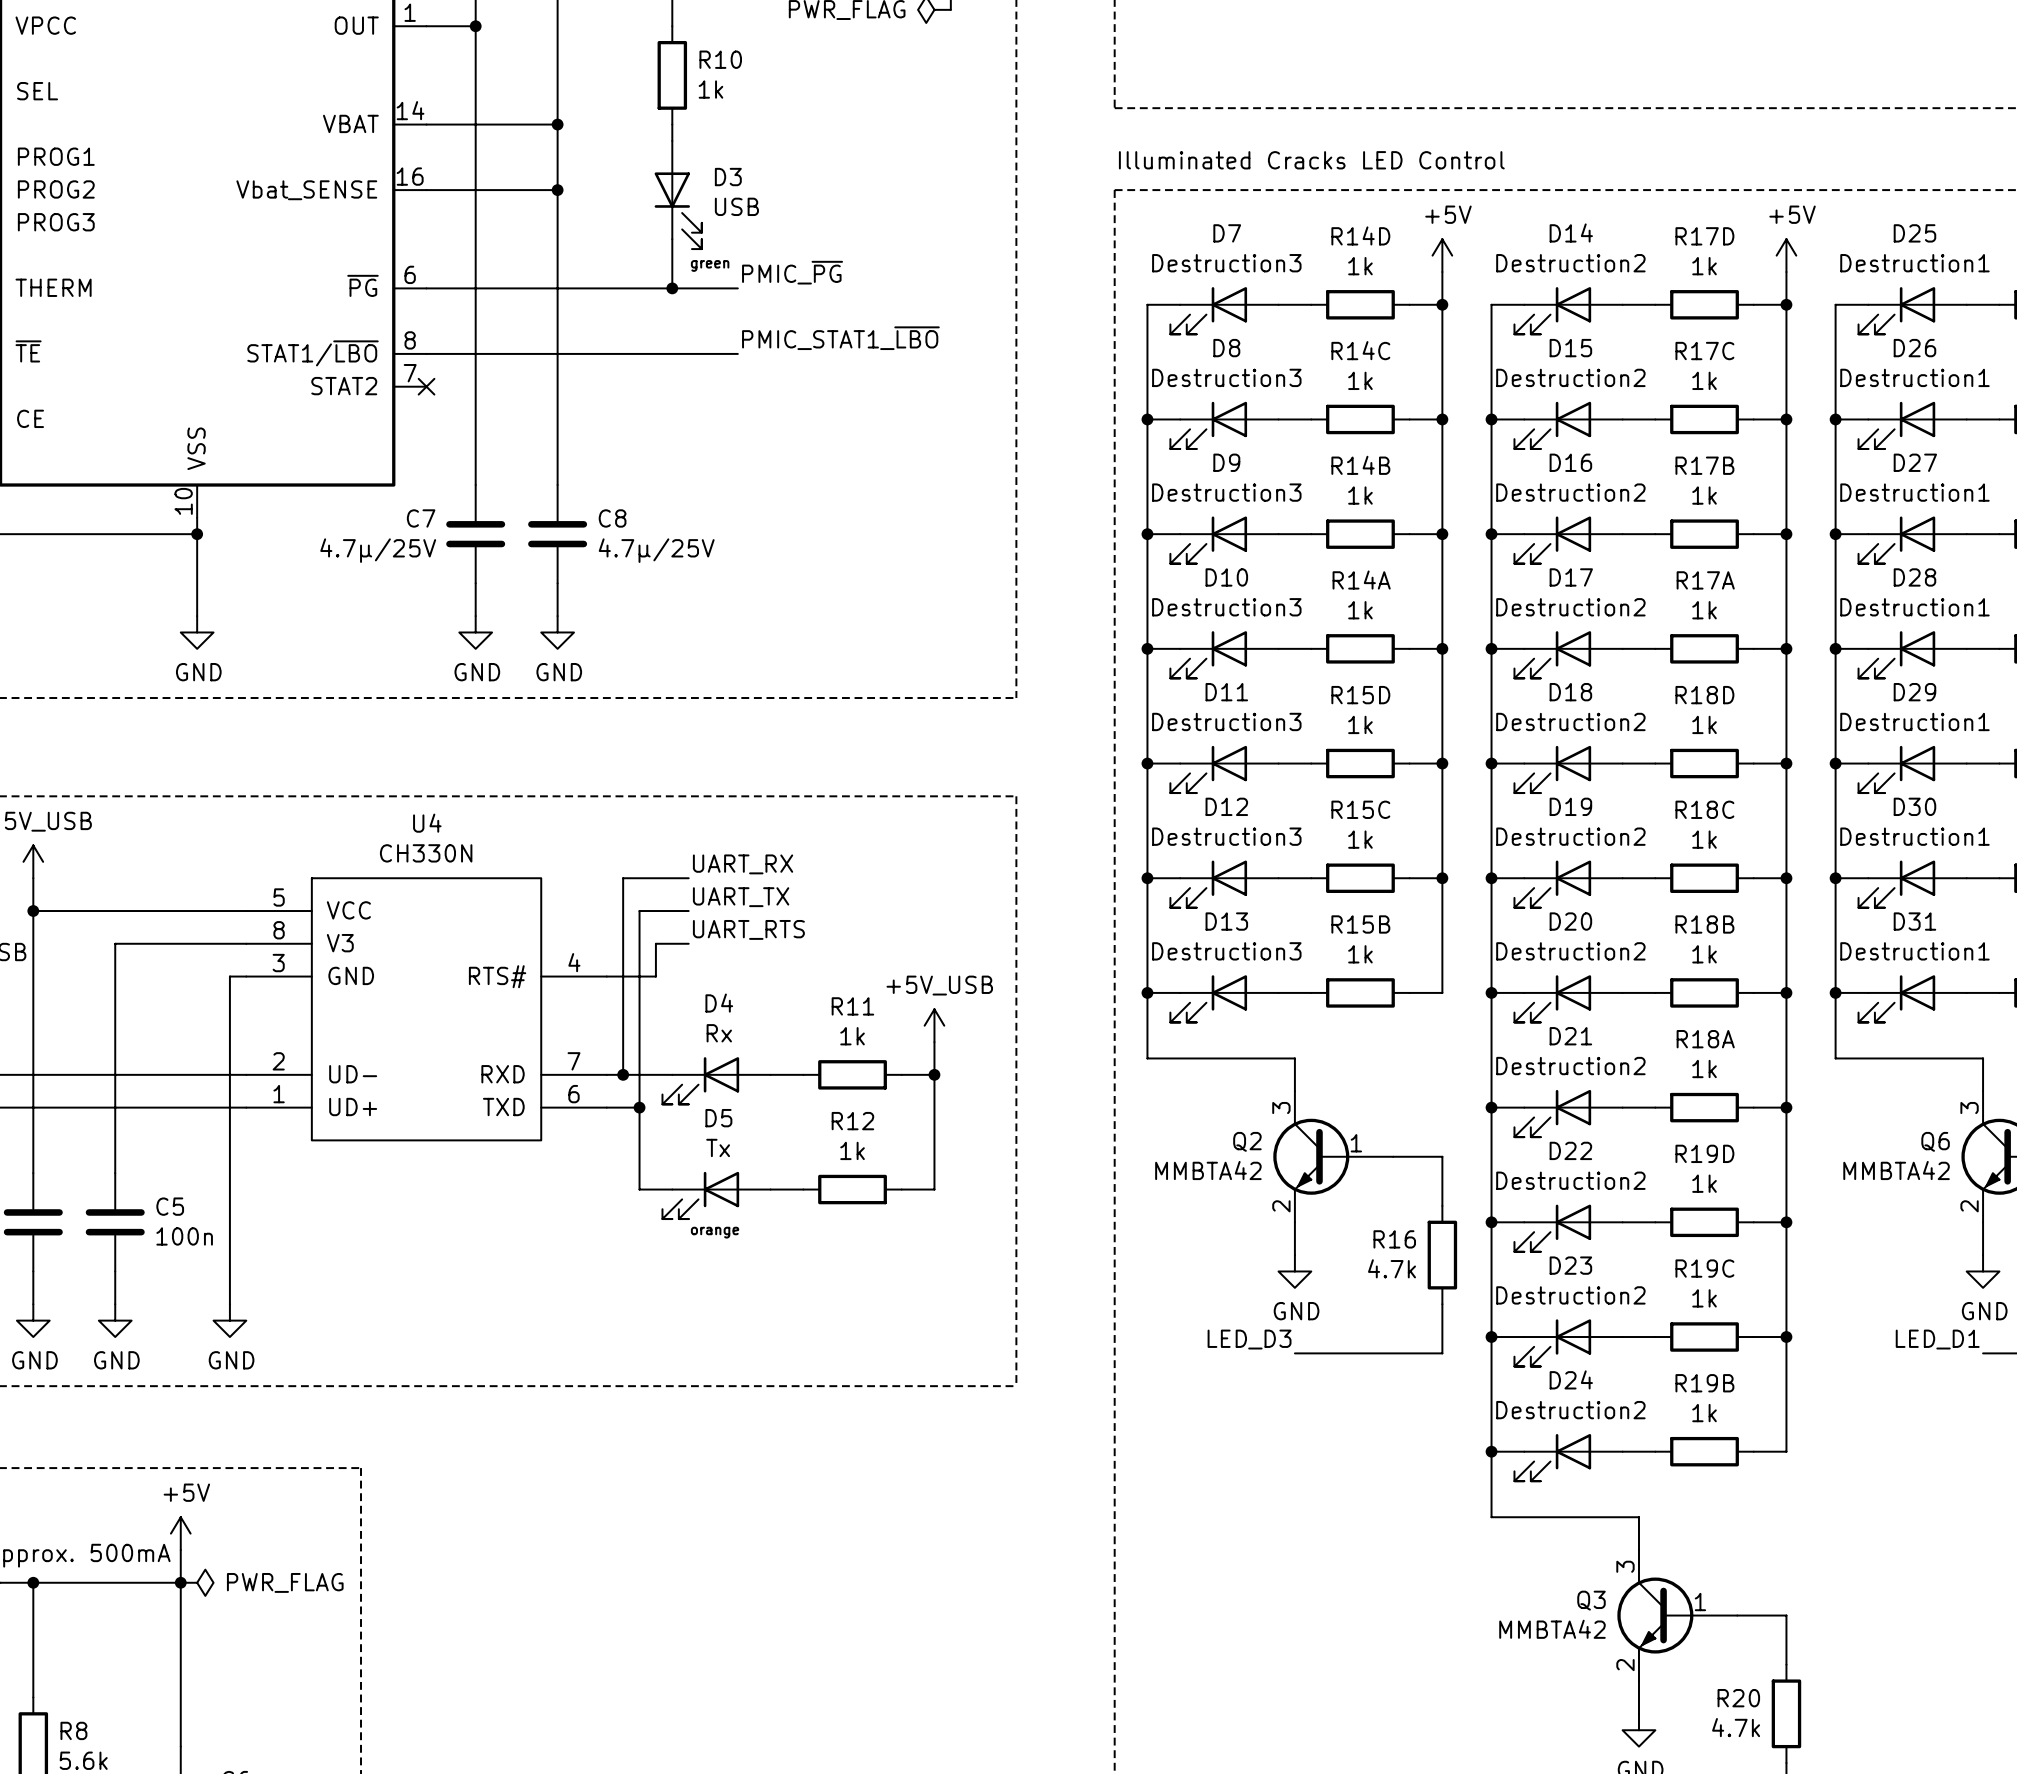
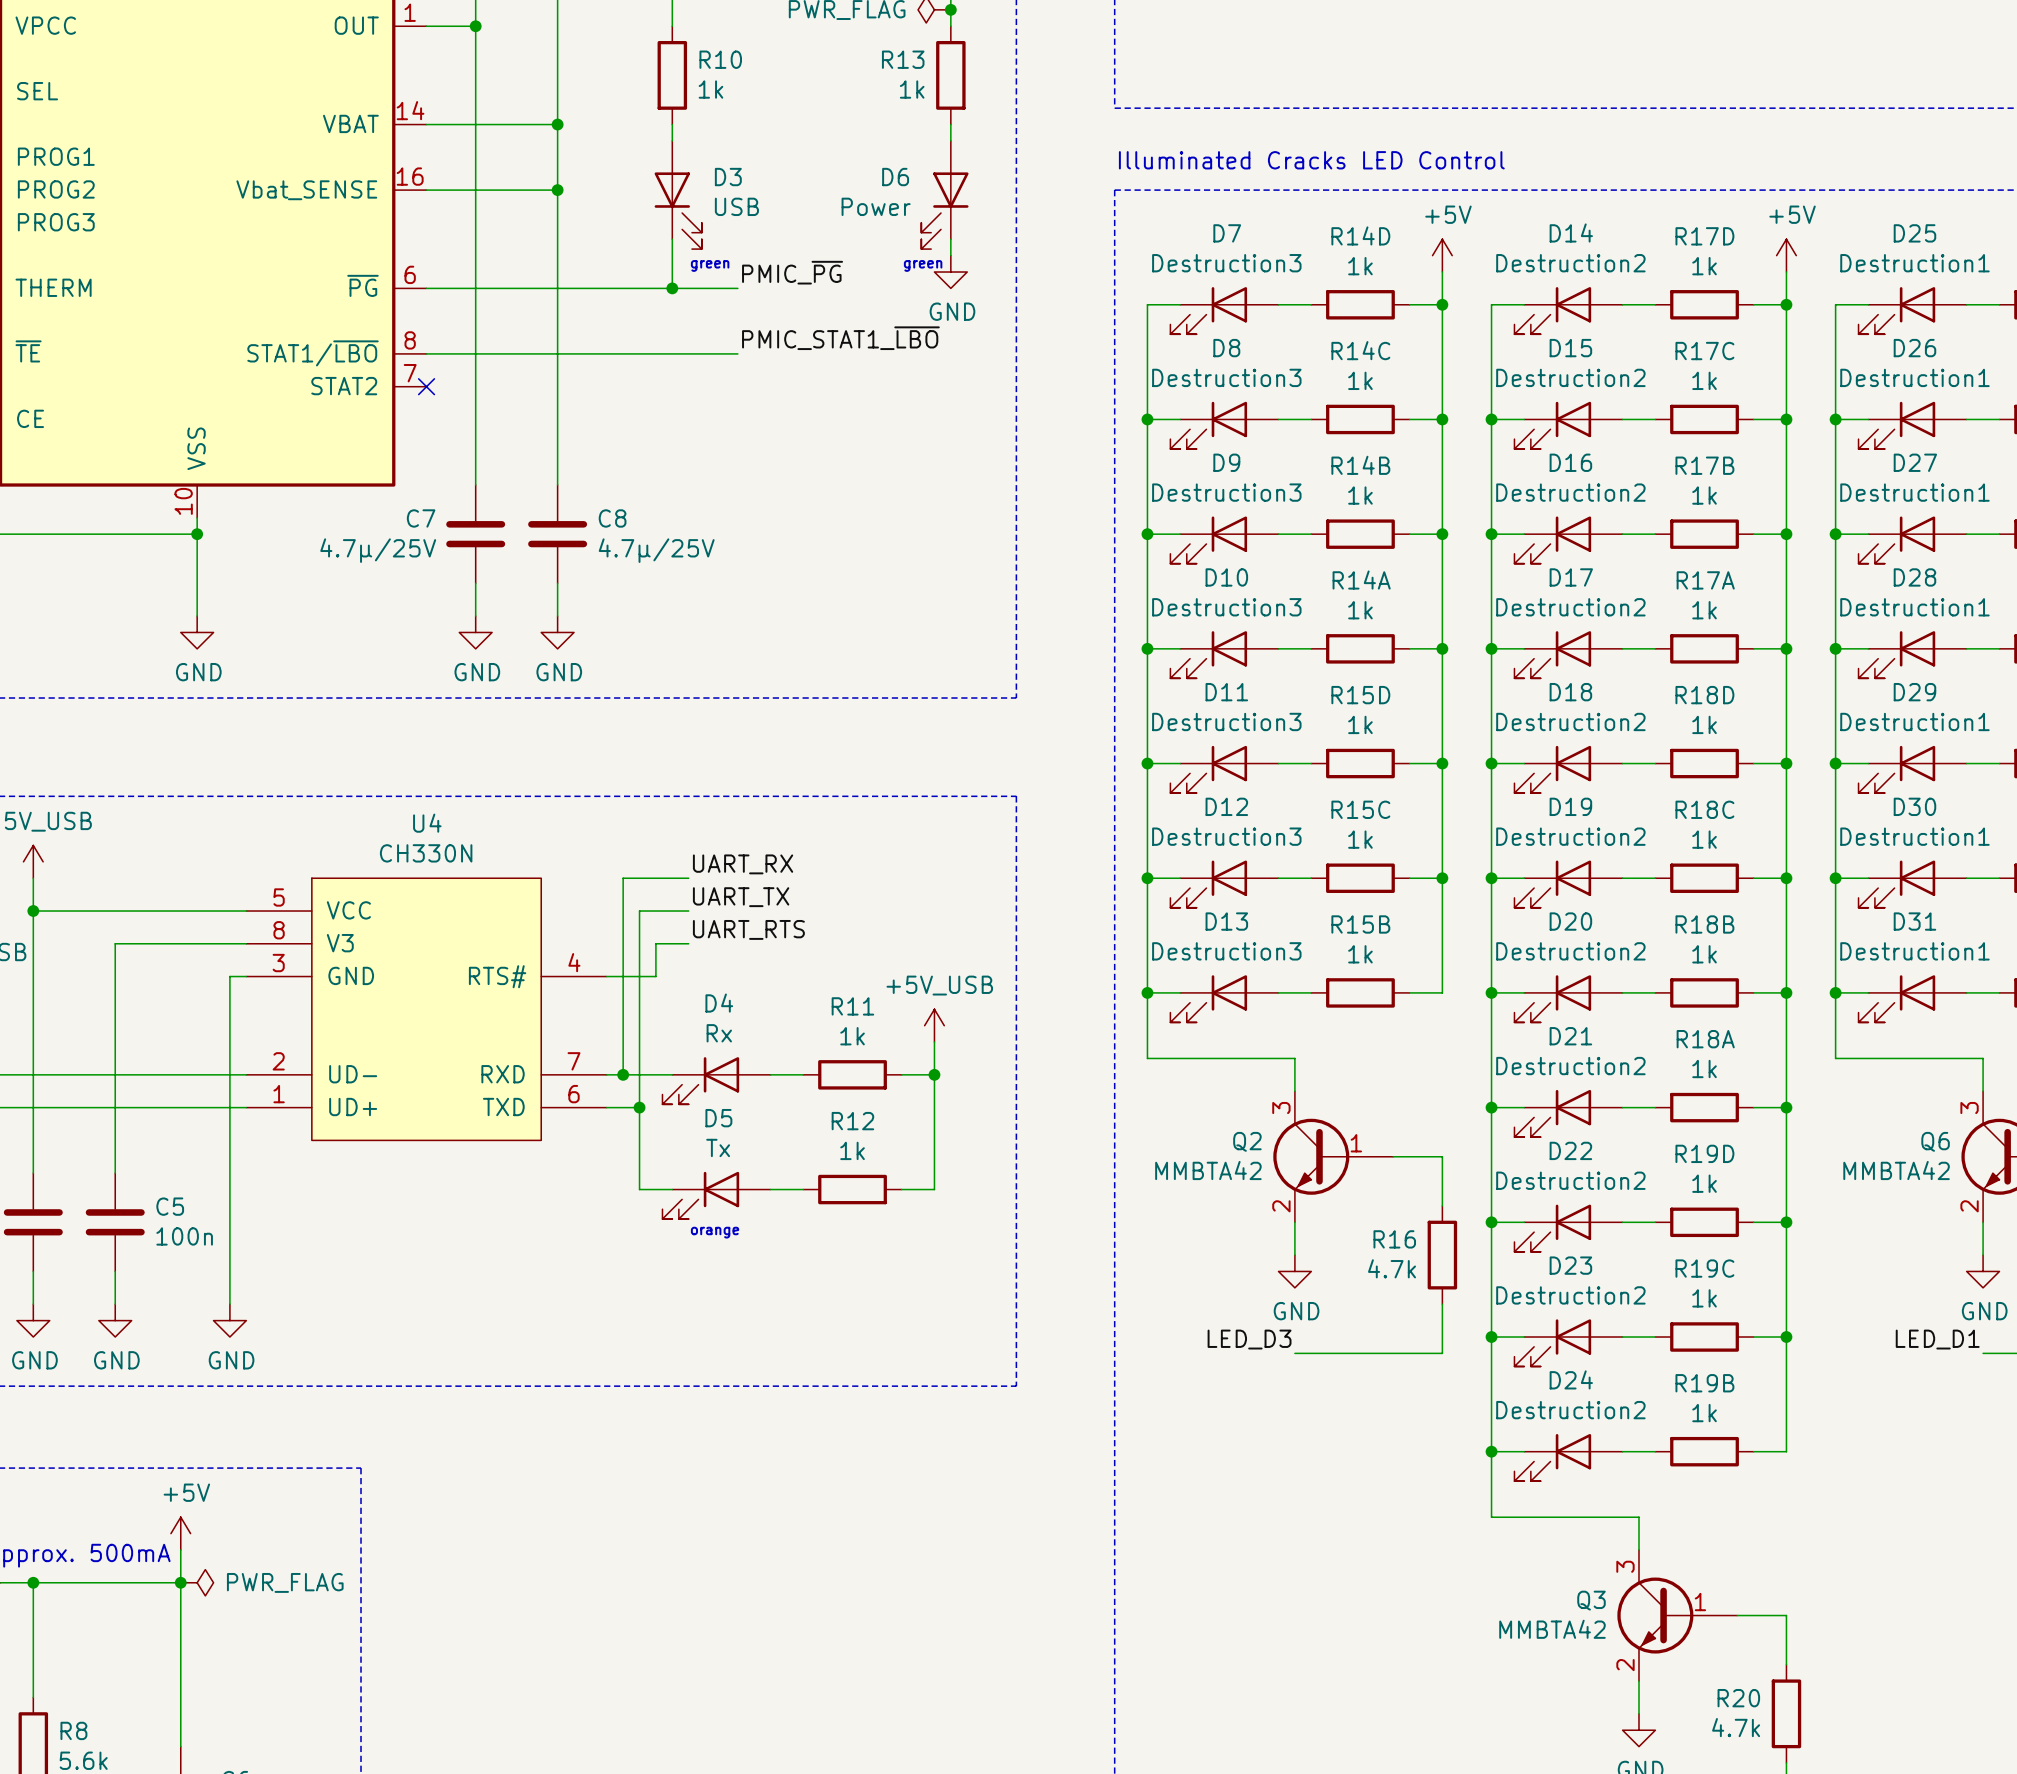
wire: none -> (950, 9) (950, 26)
junction: none -> (950, 9)
R13: none -> 1k (950, 75)
wire: none -> (950, 124) (950, 140)
D6: none -> Power (944, 195)
wire: none -> (950, 239) (950, 255)
text: none -> green (923, 265)
power symbol: none -> GND (950, 272)

